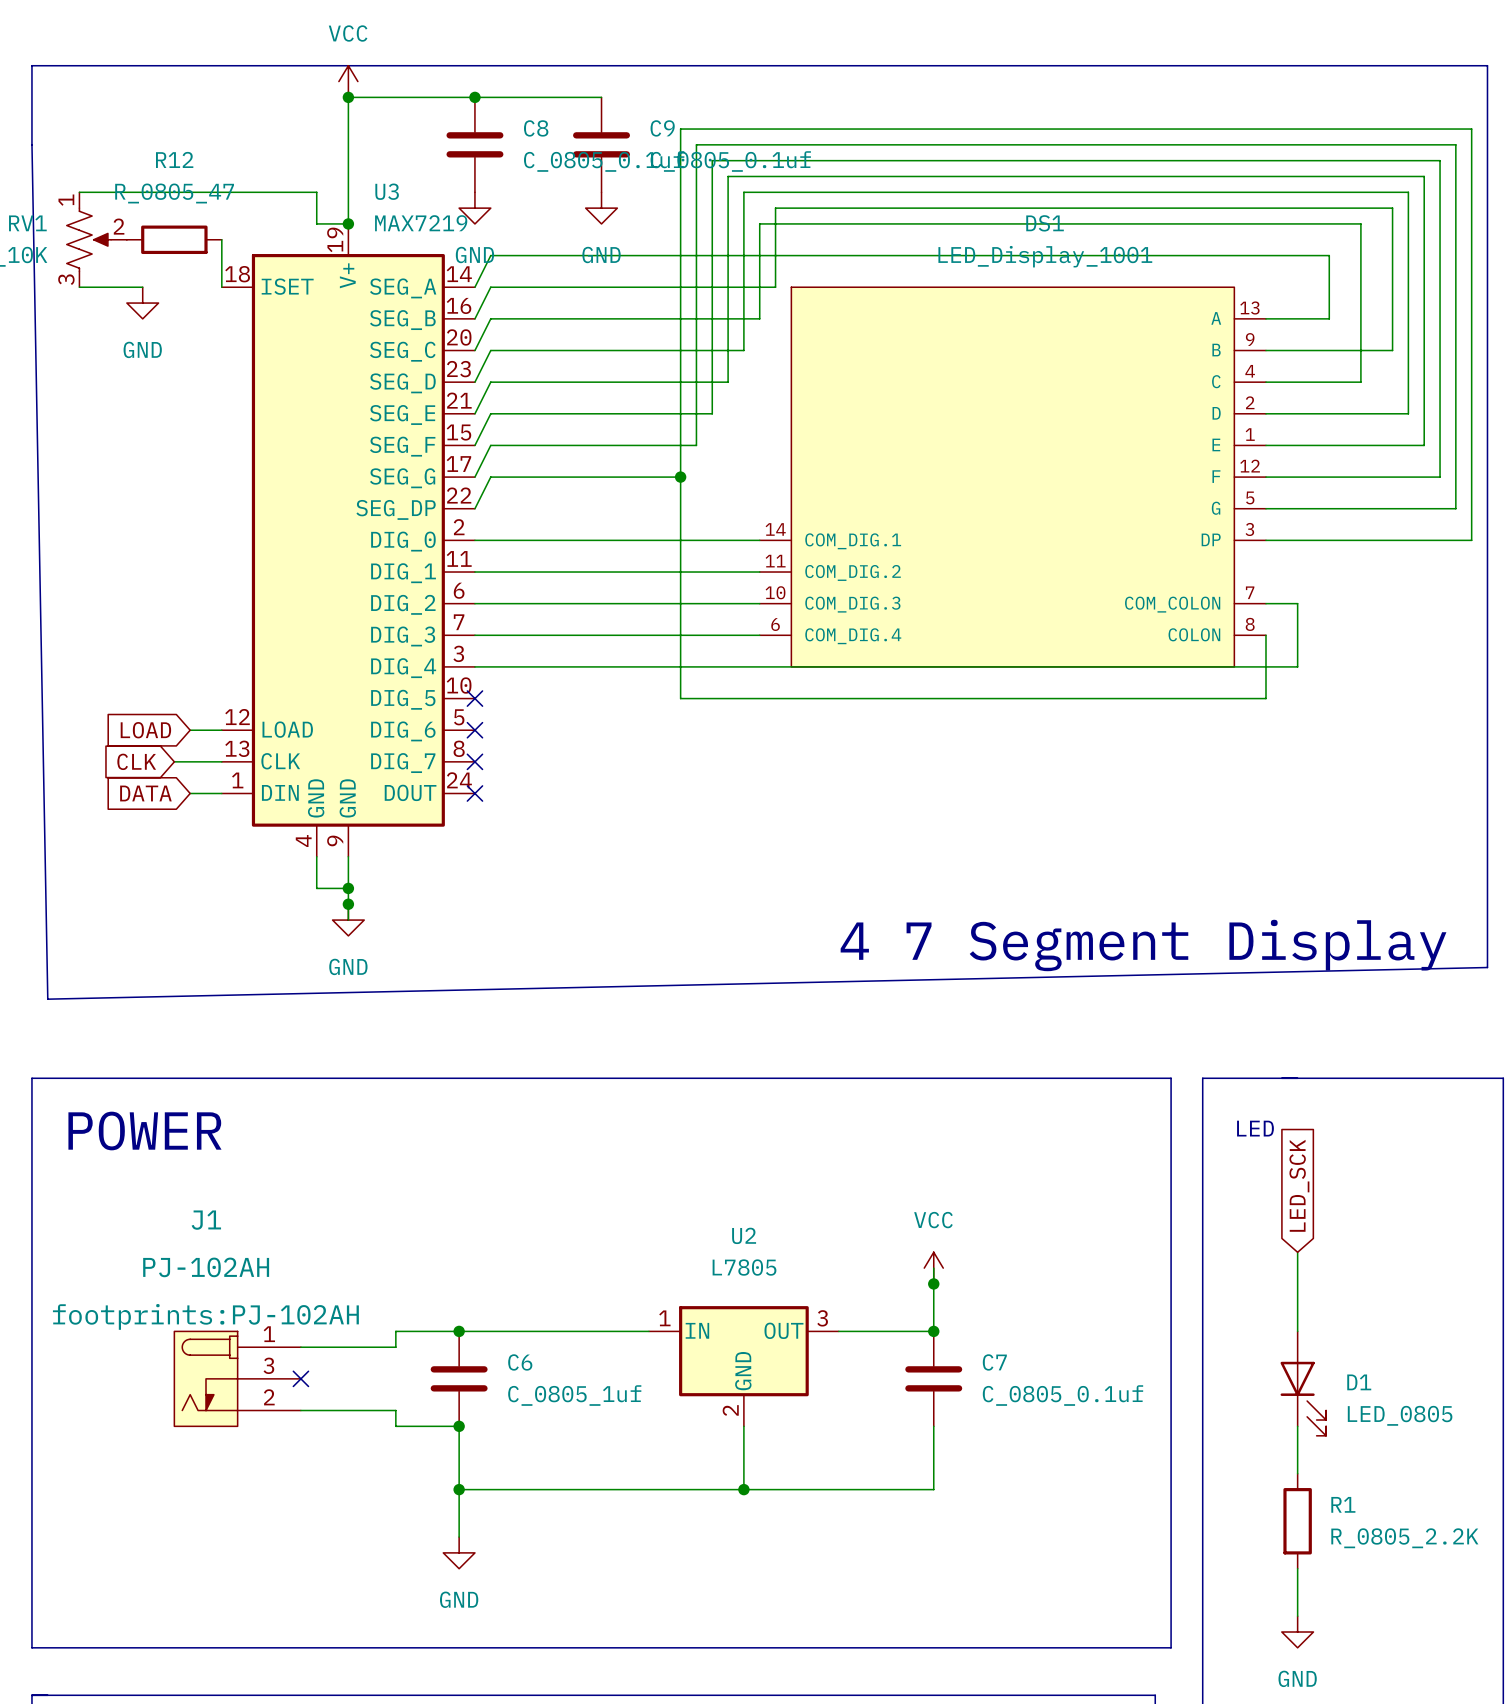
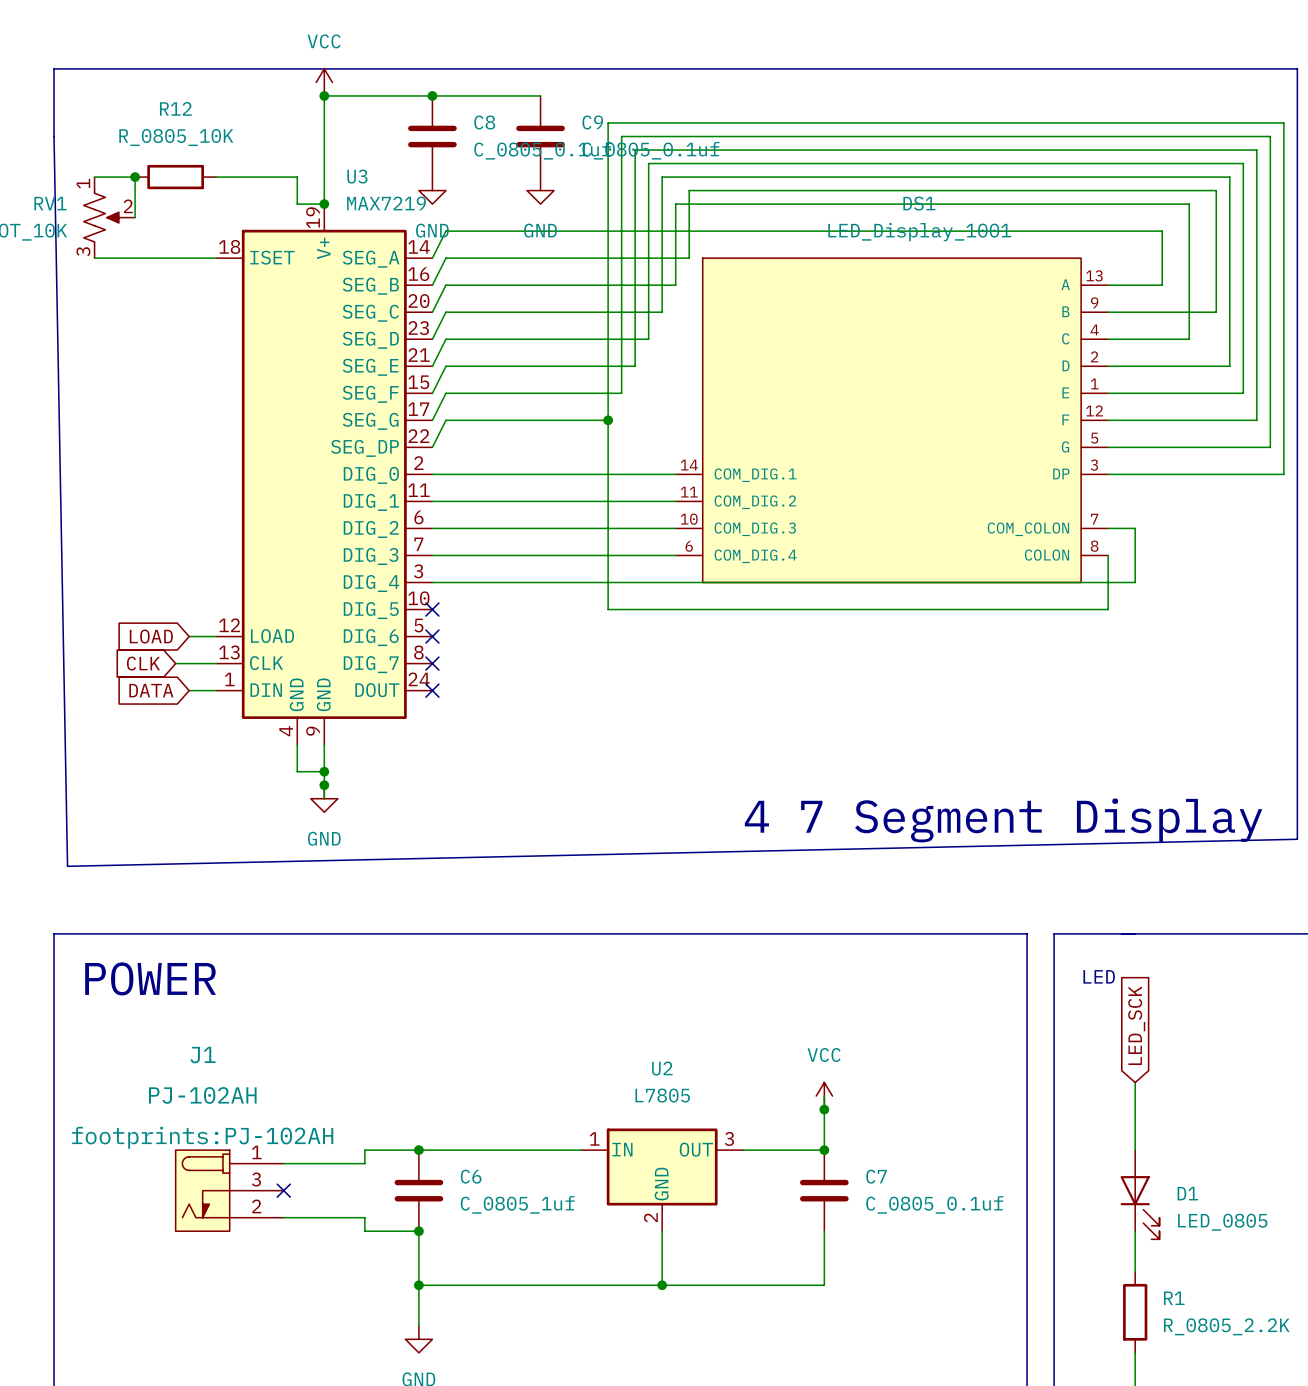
wire: (126, 192) (221, 192) -> (135, 177) (135, 217)
junction: none -> (135, 177)
R12 value: R_0805_47 (174, 193) -> R_0805_10K (176, 137)
R12 position: (174, 239) -> (175, 177)
wire: (221, 239) (221, 287) -> (148, 258) (216, 258)
power symbol: GND (142, 303) -> none

